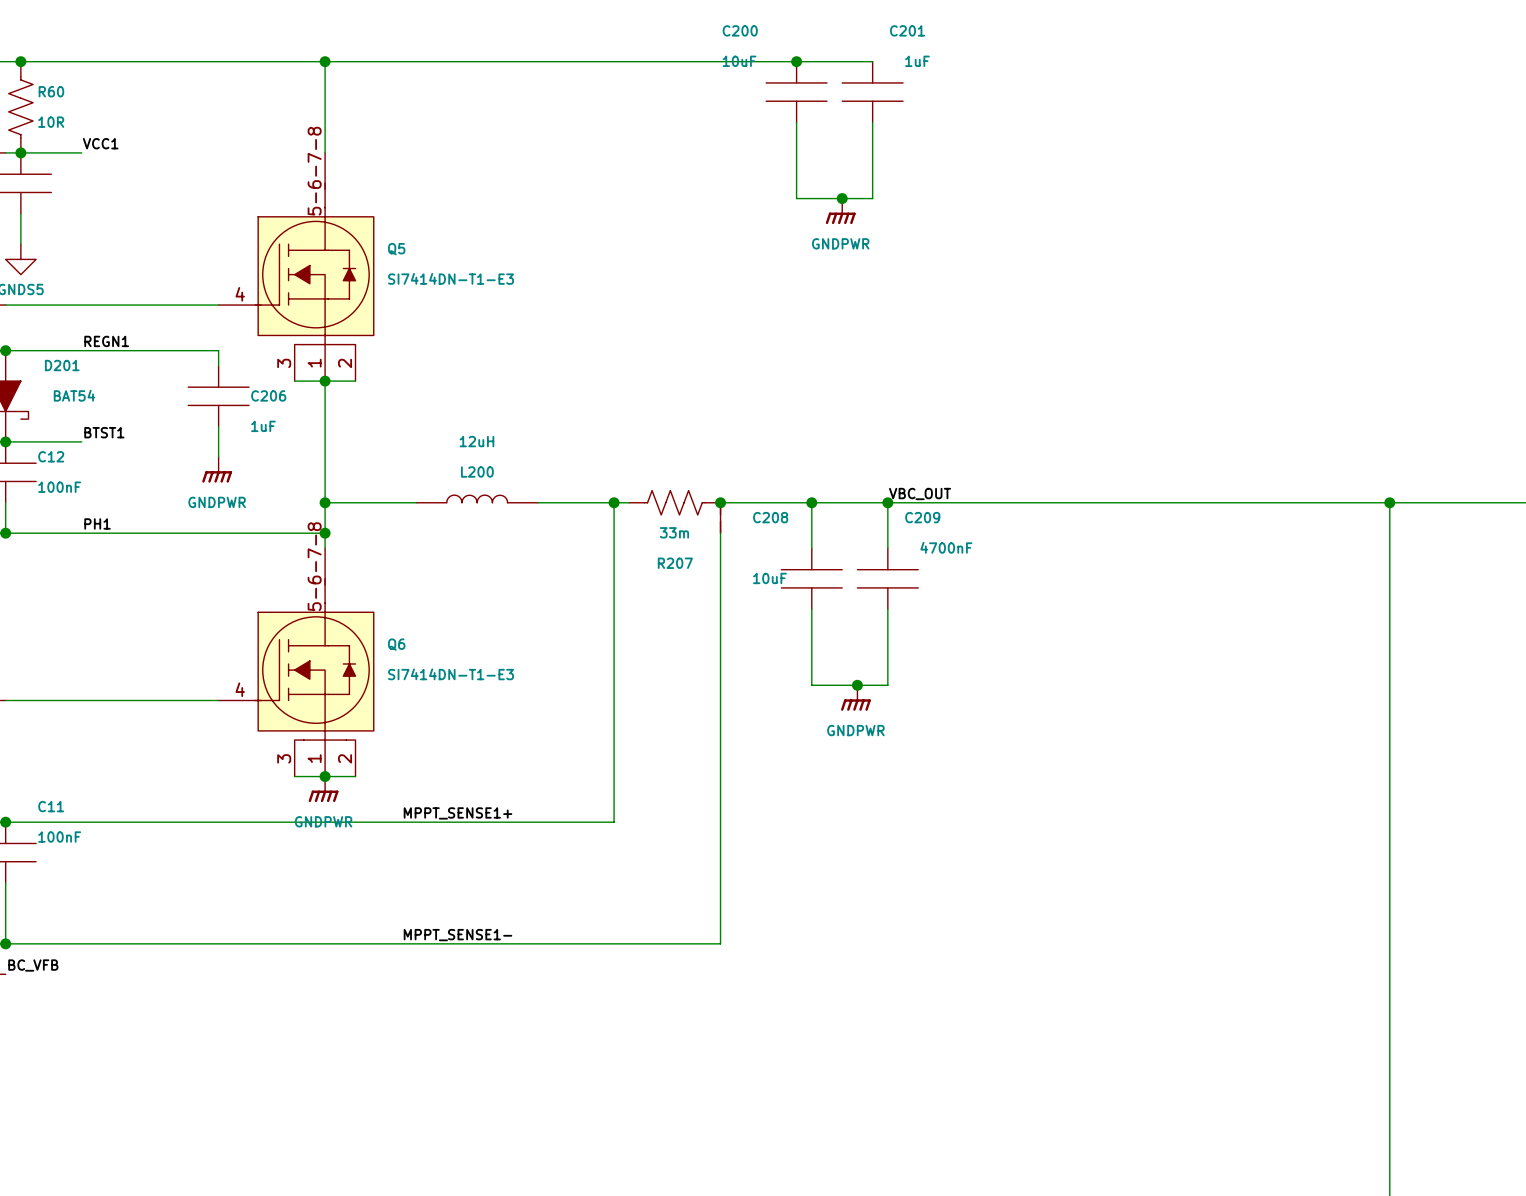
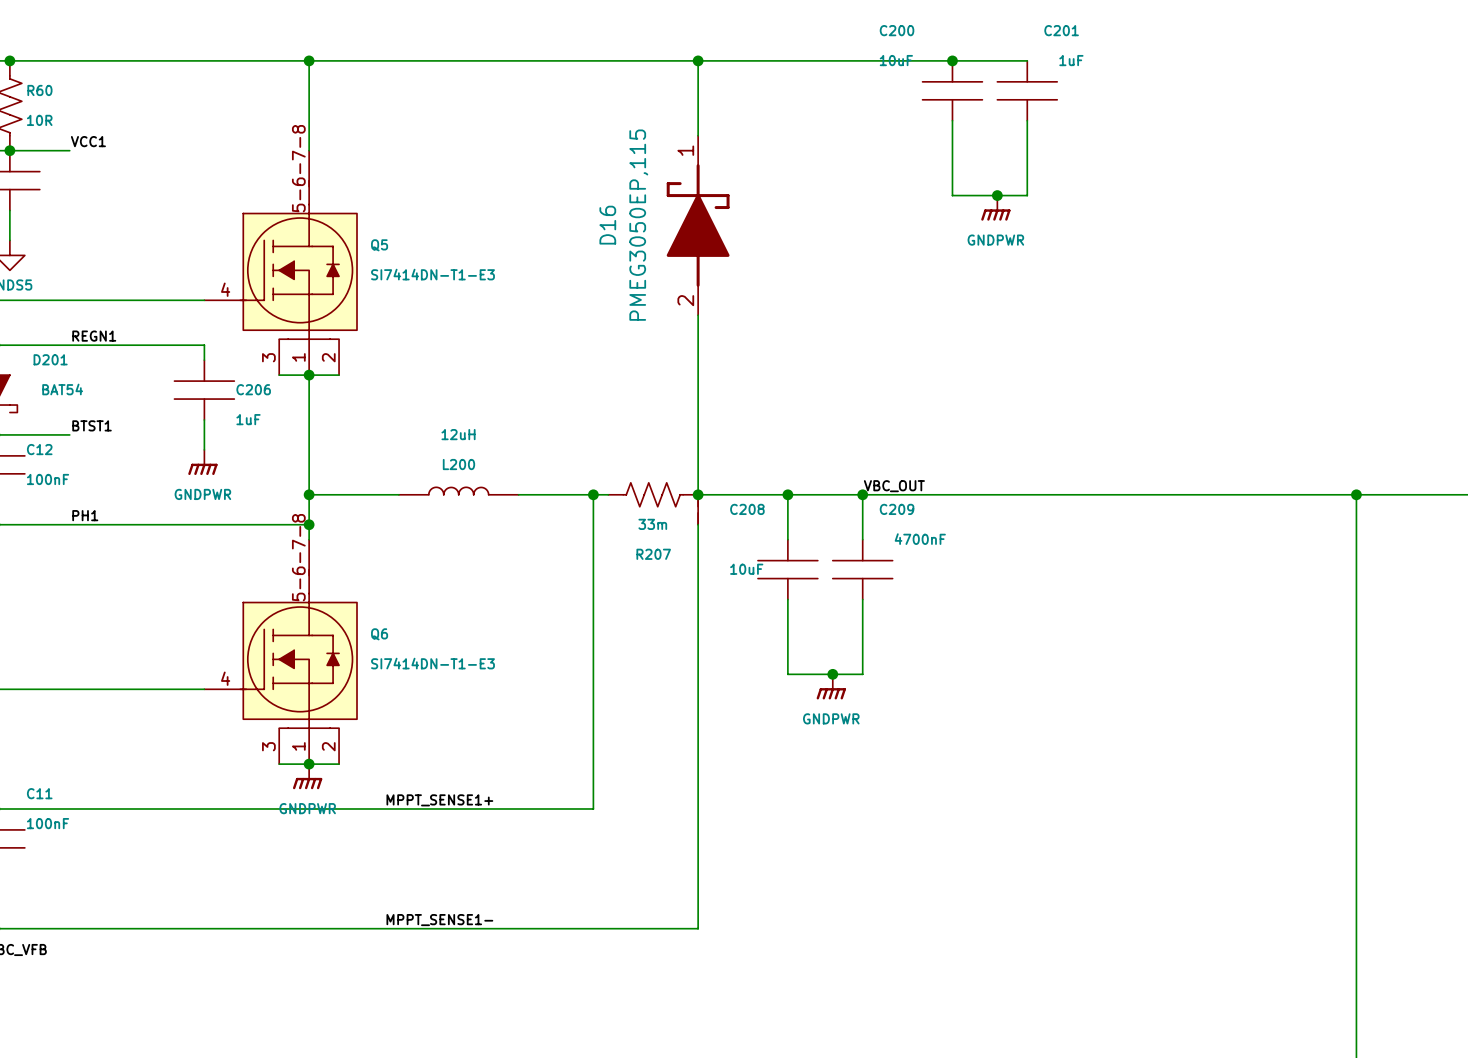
wire: none -> (698, 60) (698, 135)
junction: none -> (698, 60)
junction: (796, 61) -> none
wire: none -> (847, 60) (1027, 60)
junction: none -> (952, 60)
C200 position: (796, 92) -> (952, 90)
C201 position: (872, 92) -> (1027, 90)
wire: (796, 122) (796, 198) (872, 198) (872, 122) -> (952, 120) (952, 195) (1027, 195) (1027, 120)
junction: (842, 198) -> none
junction: none -> (997, 195)
power symbol position: GNDPWR (840, 211) -> GNDPWR (995, 208)
D16: none -> PMEG3050EP,115 (698, 225)
wire: none -> (698, 315) (698, 494)

